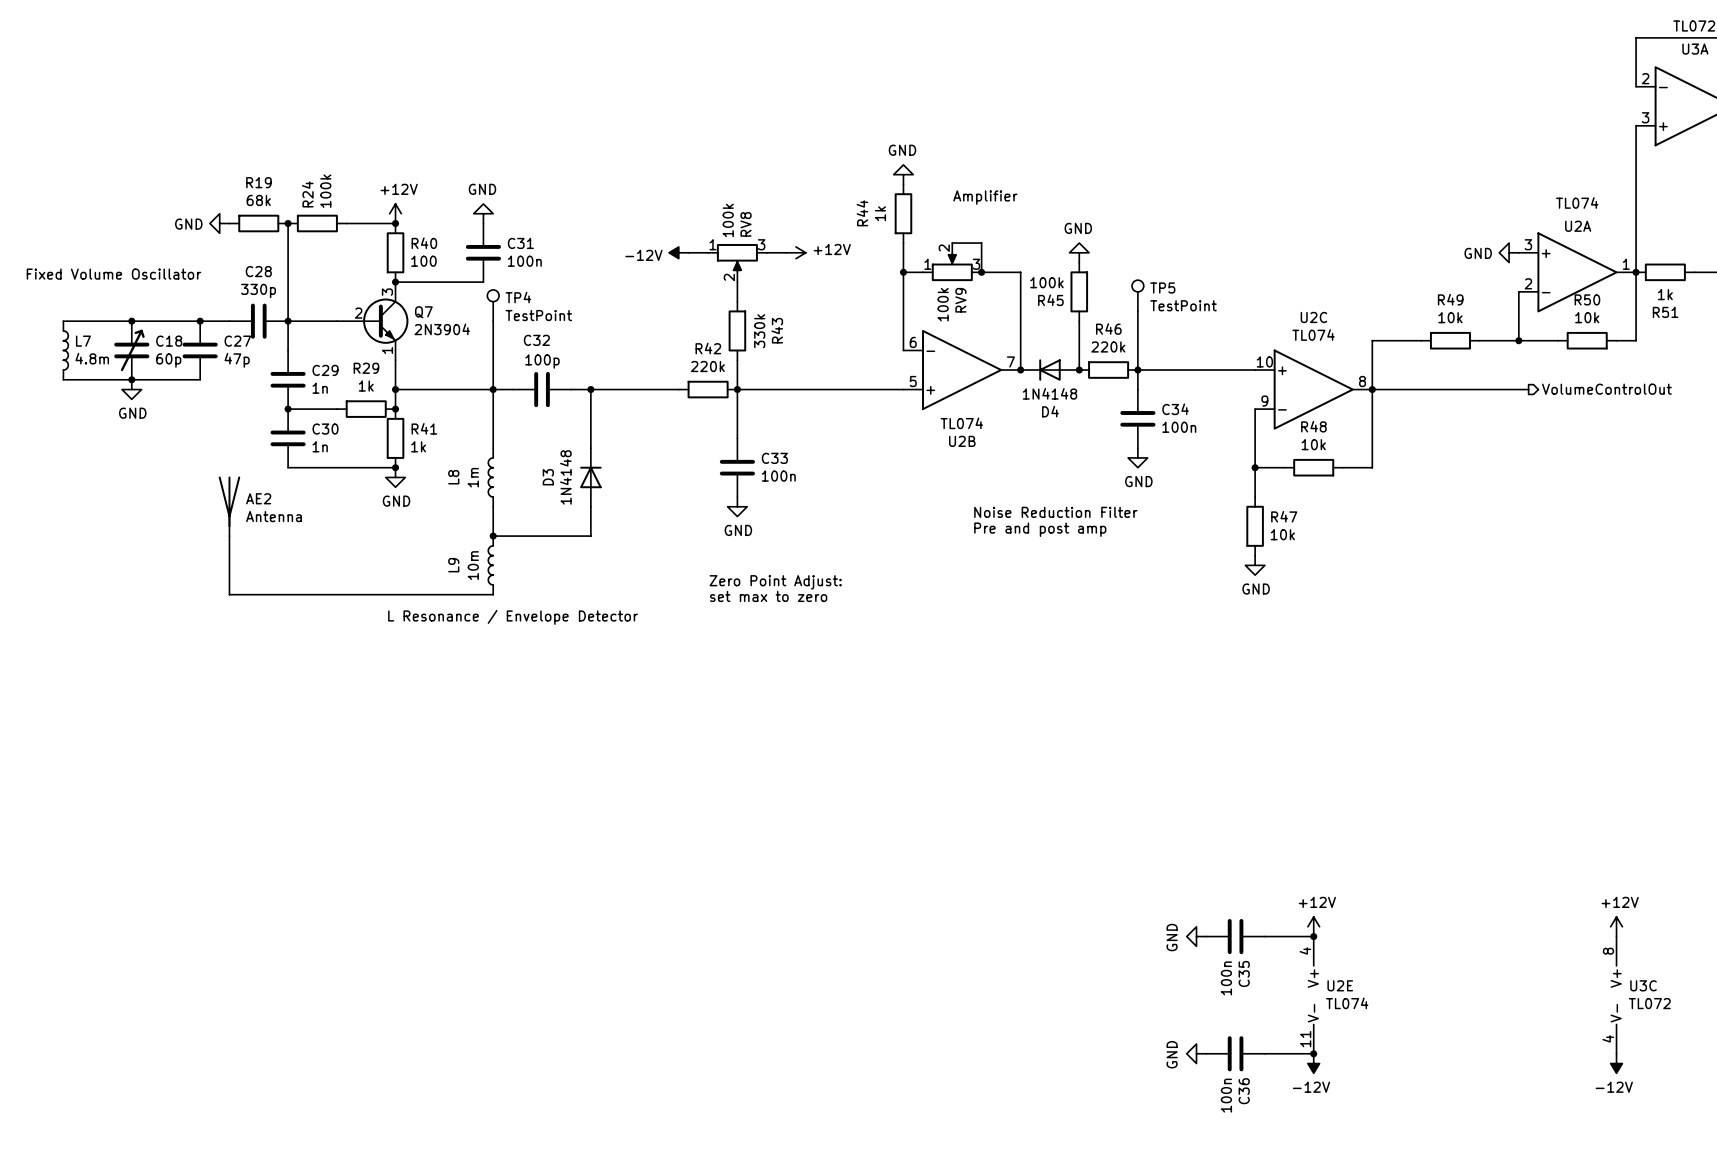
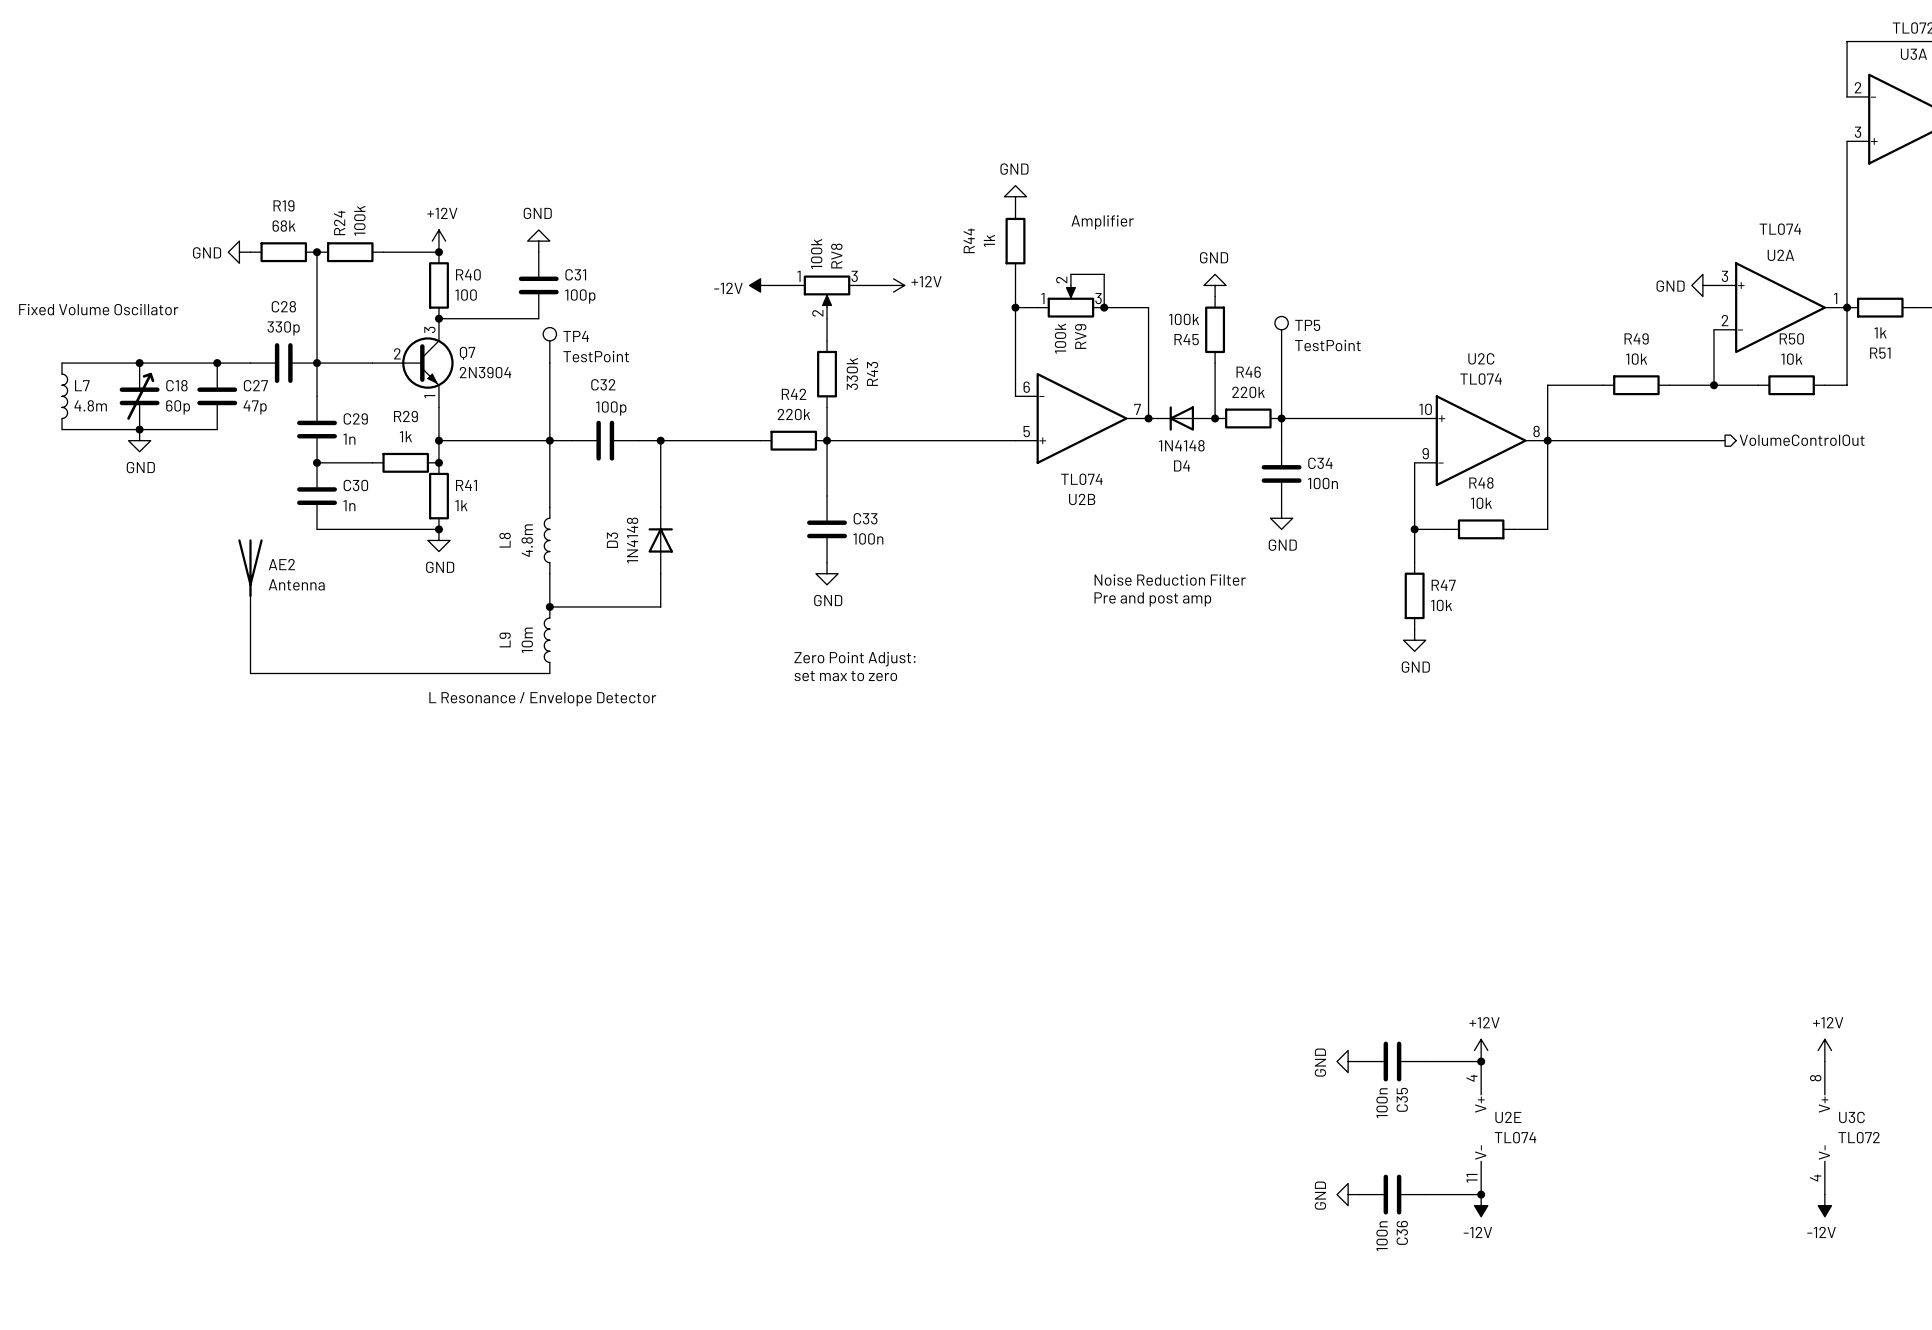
C31 value: 100n (524, 261) -> 100p (580, 296)
L8 value: 1m (473, 477) -> 4.8m (527, 540)

